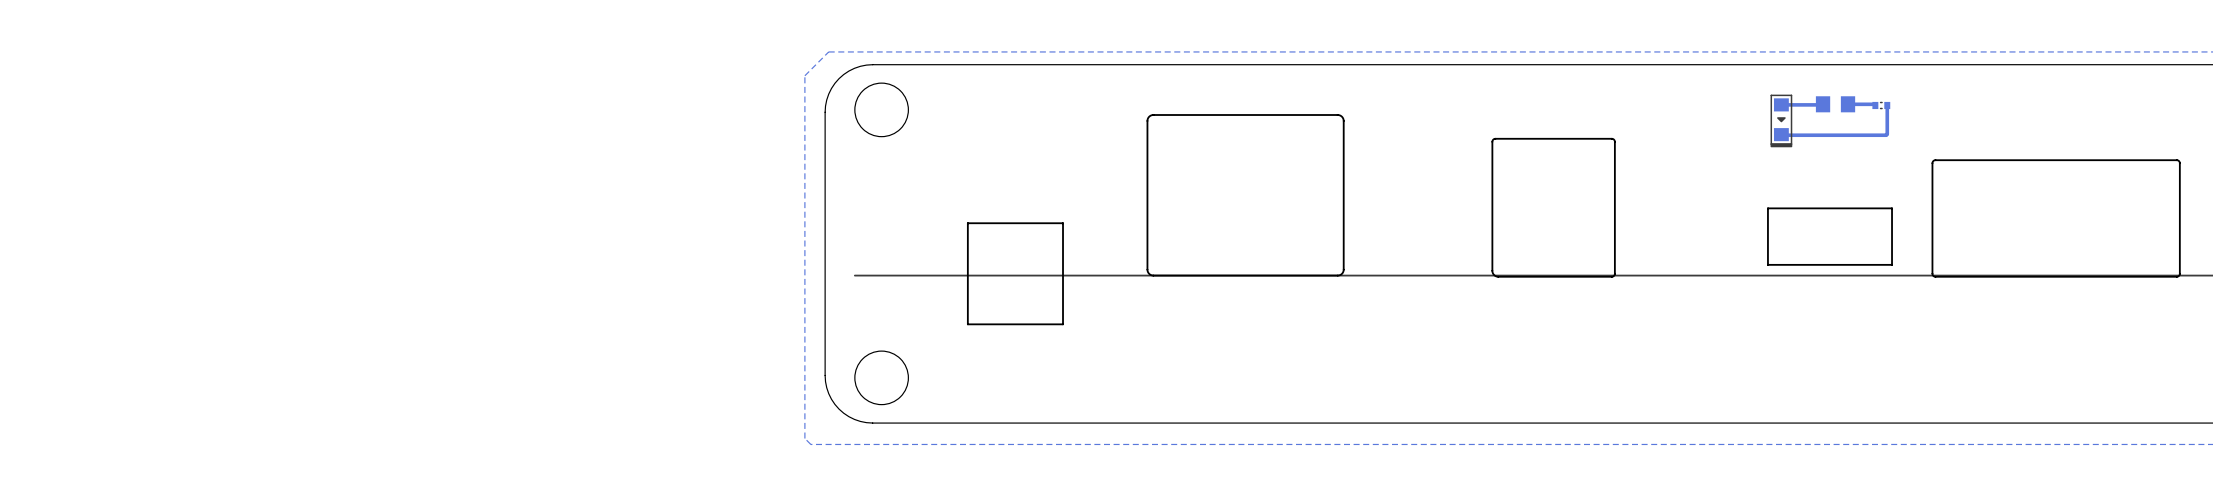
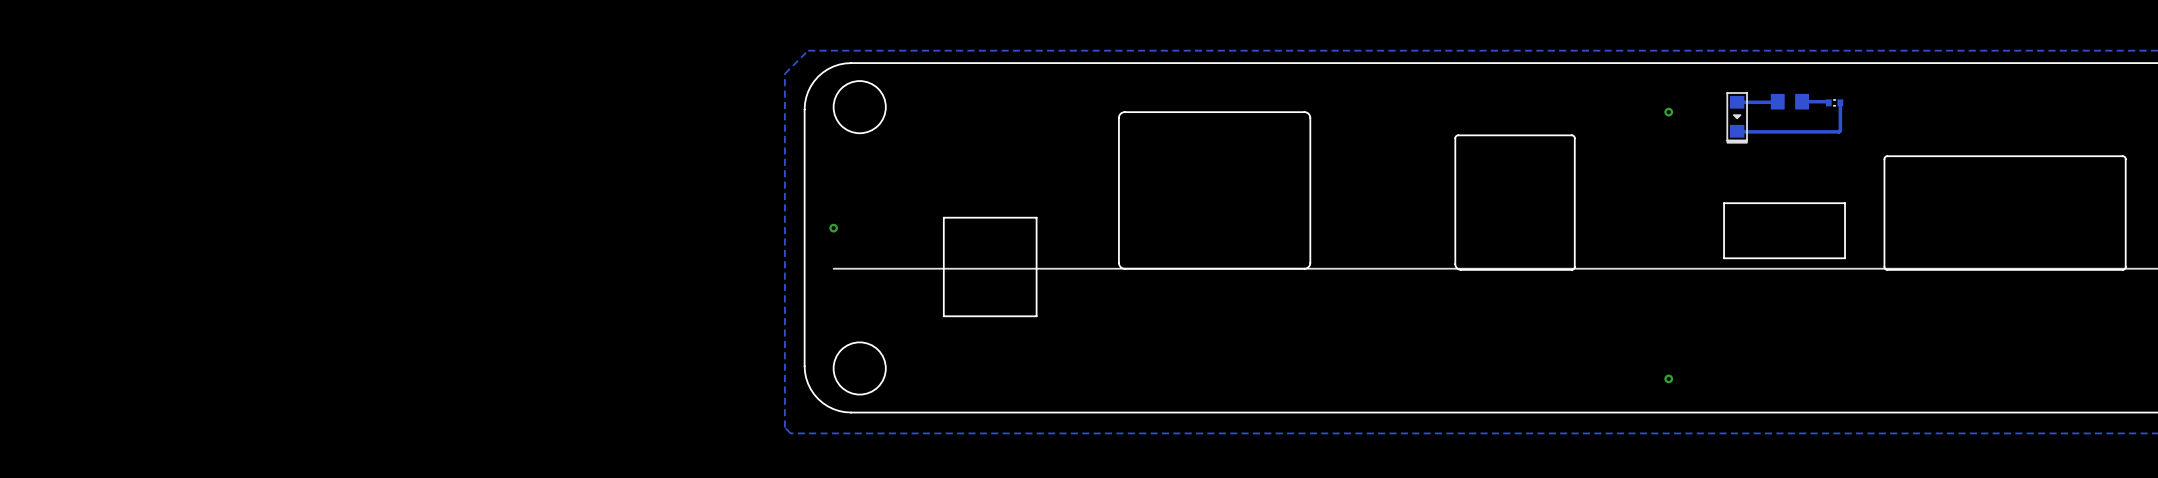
via: none -> (1668, 112)
via: none -> (833, 228)
via: none -> (1668, 378)

